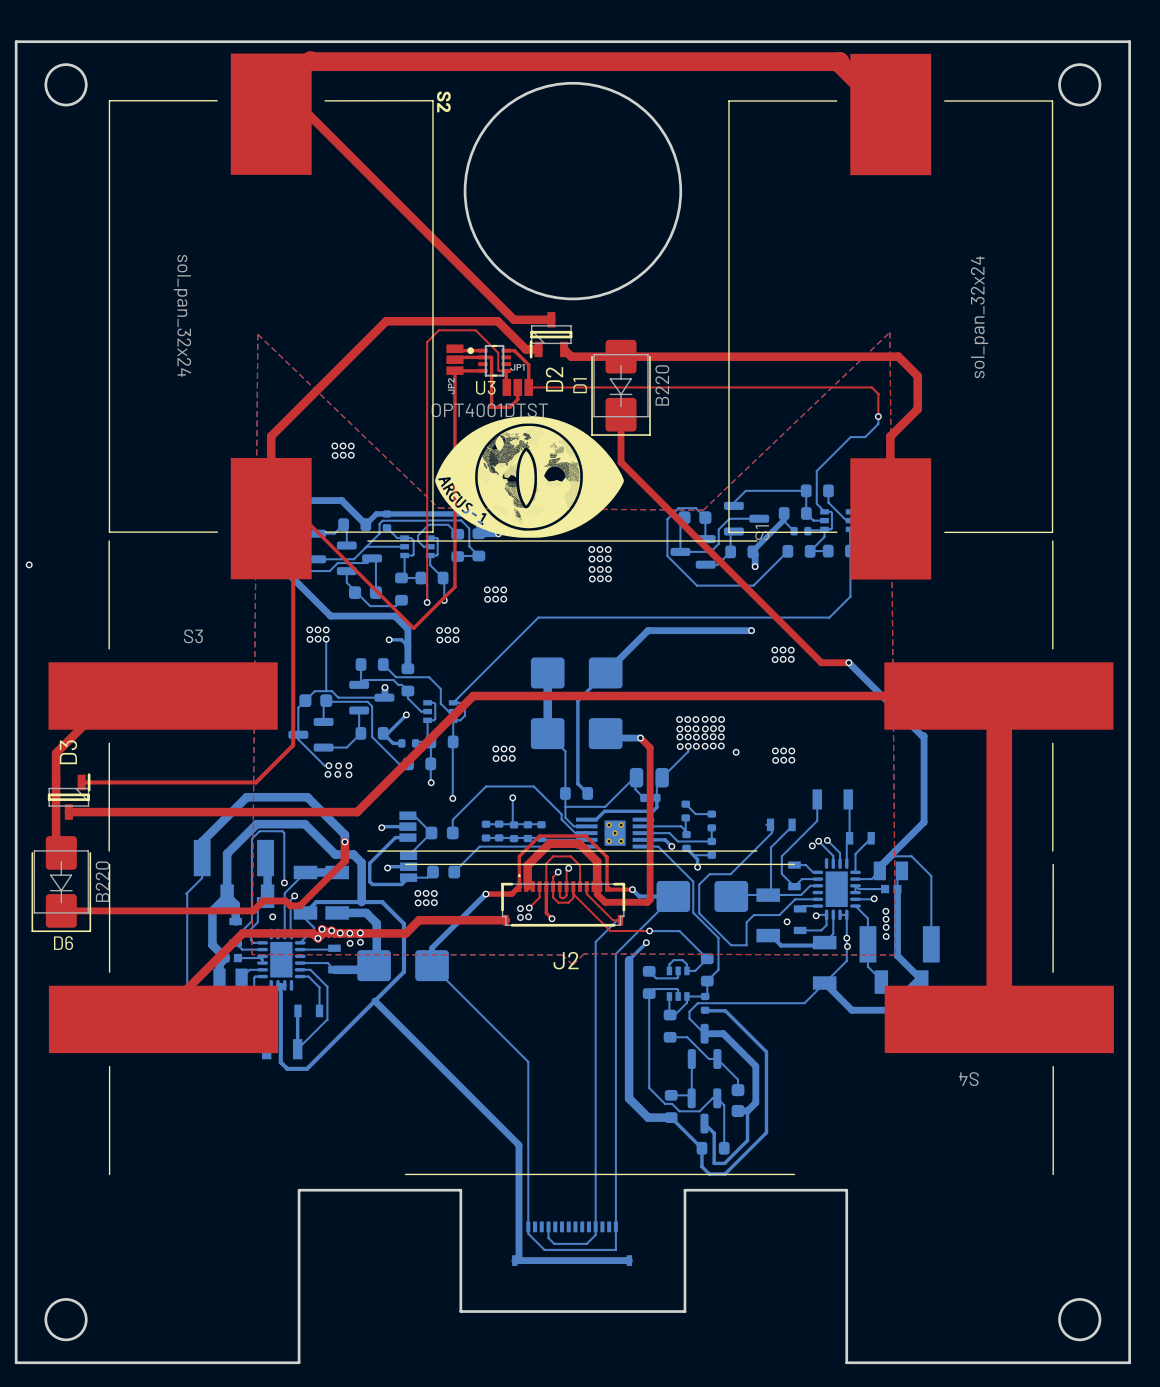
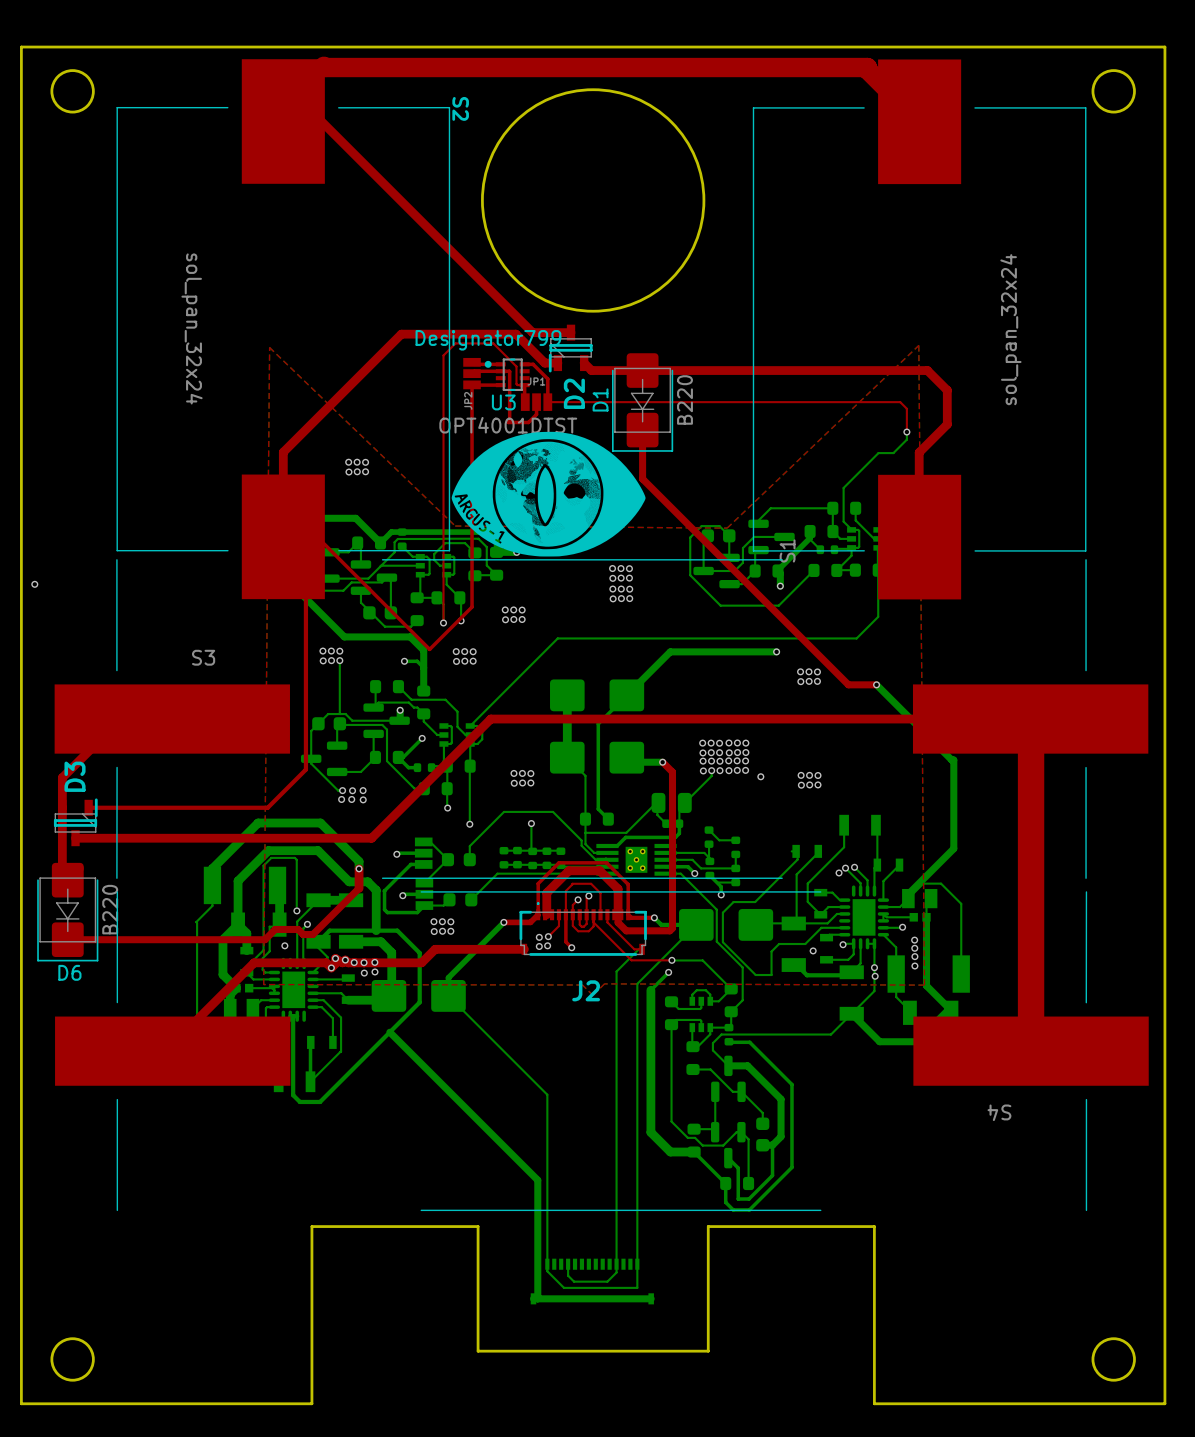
U3 text: none -> Designator799 (488, 340)

